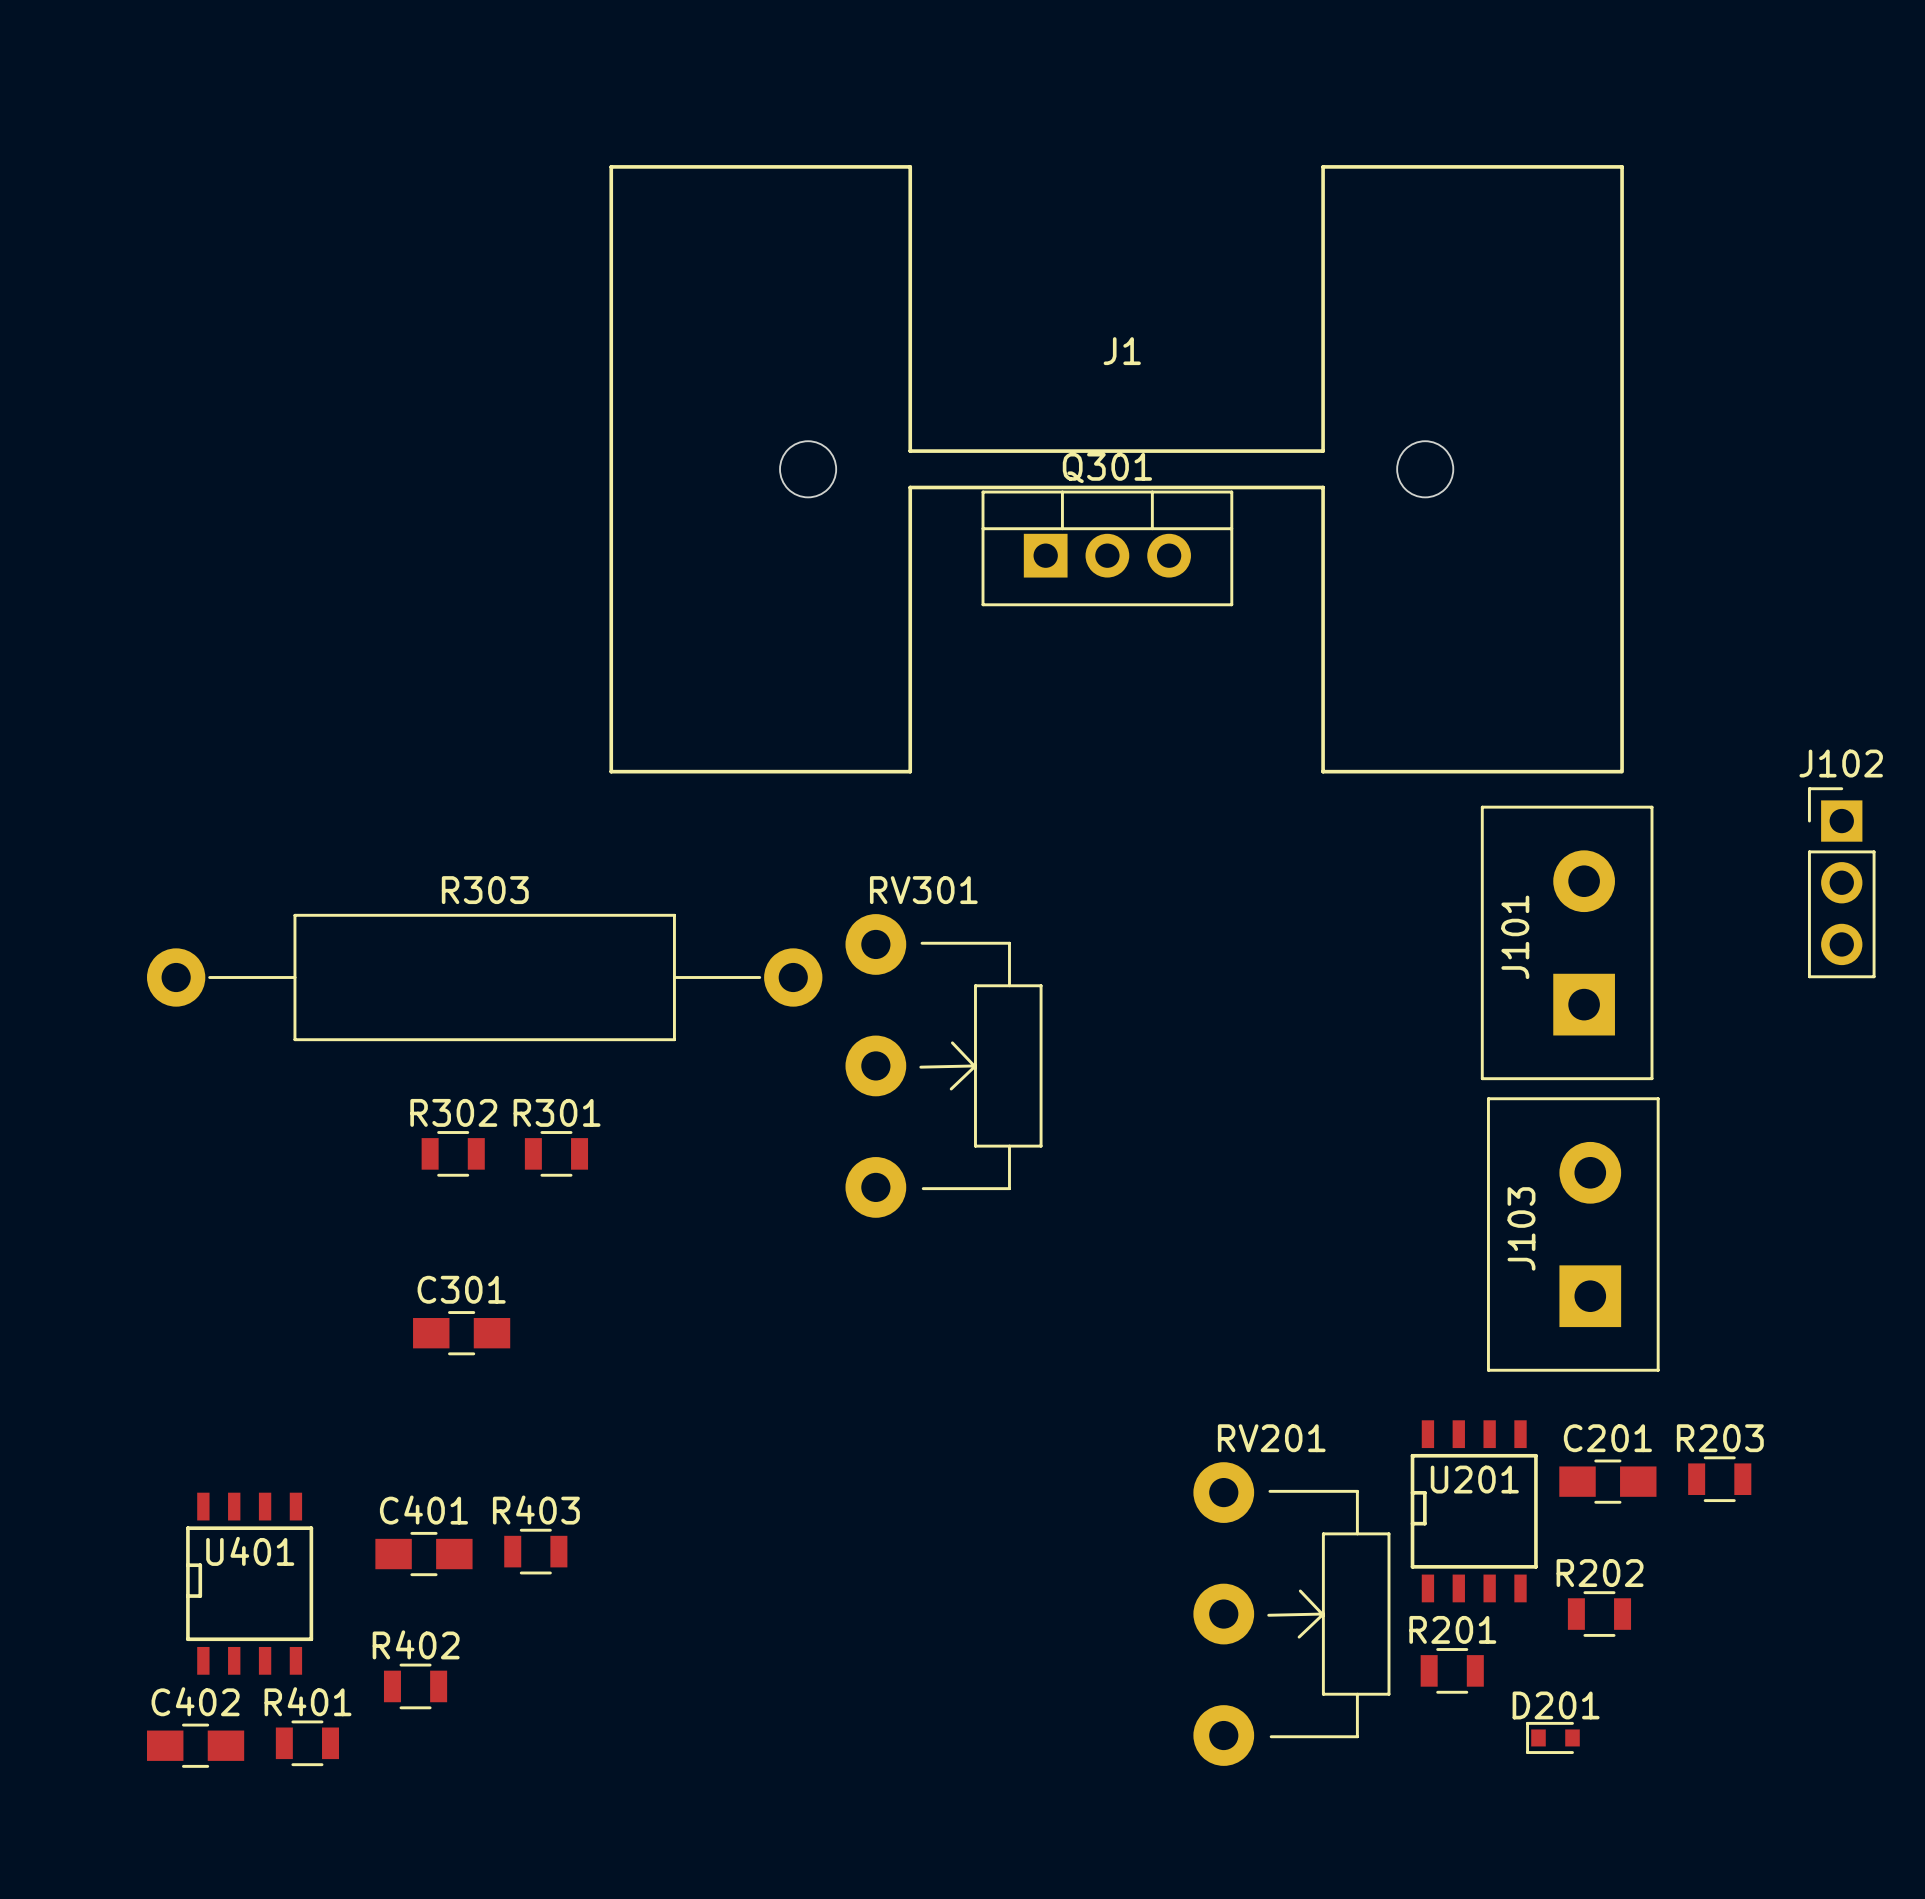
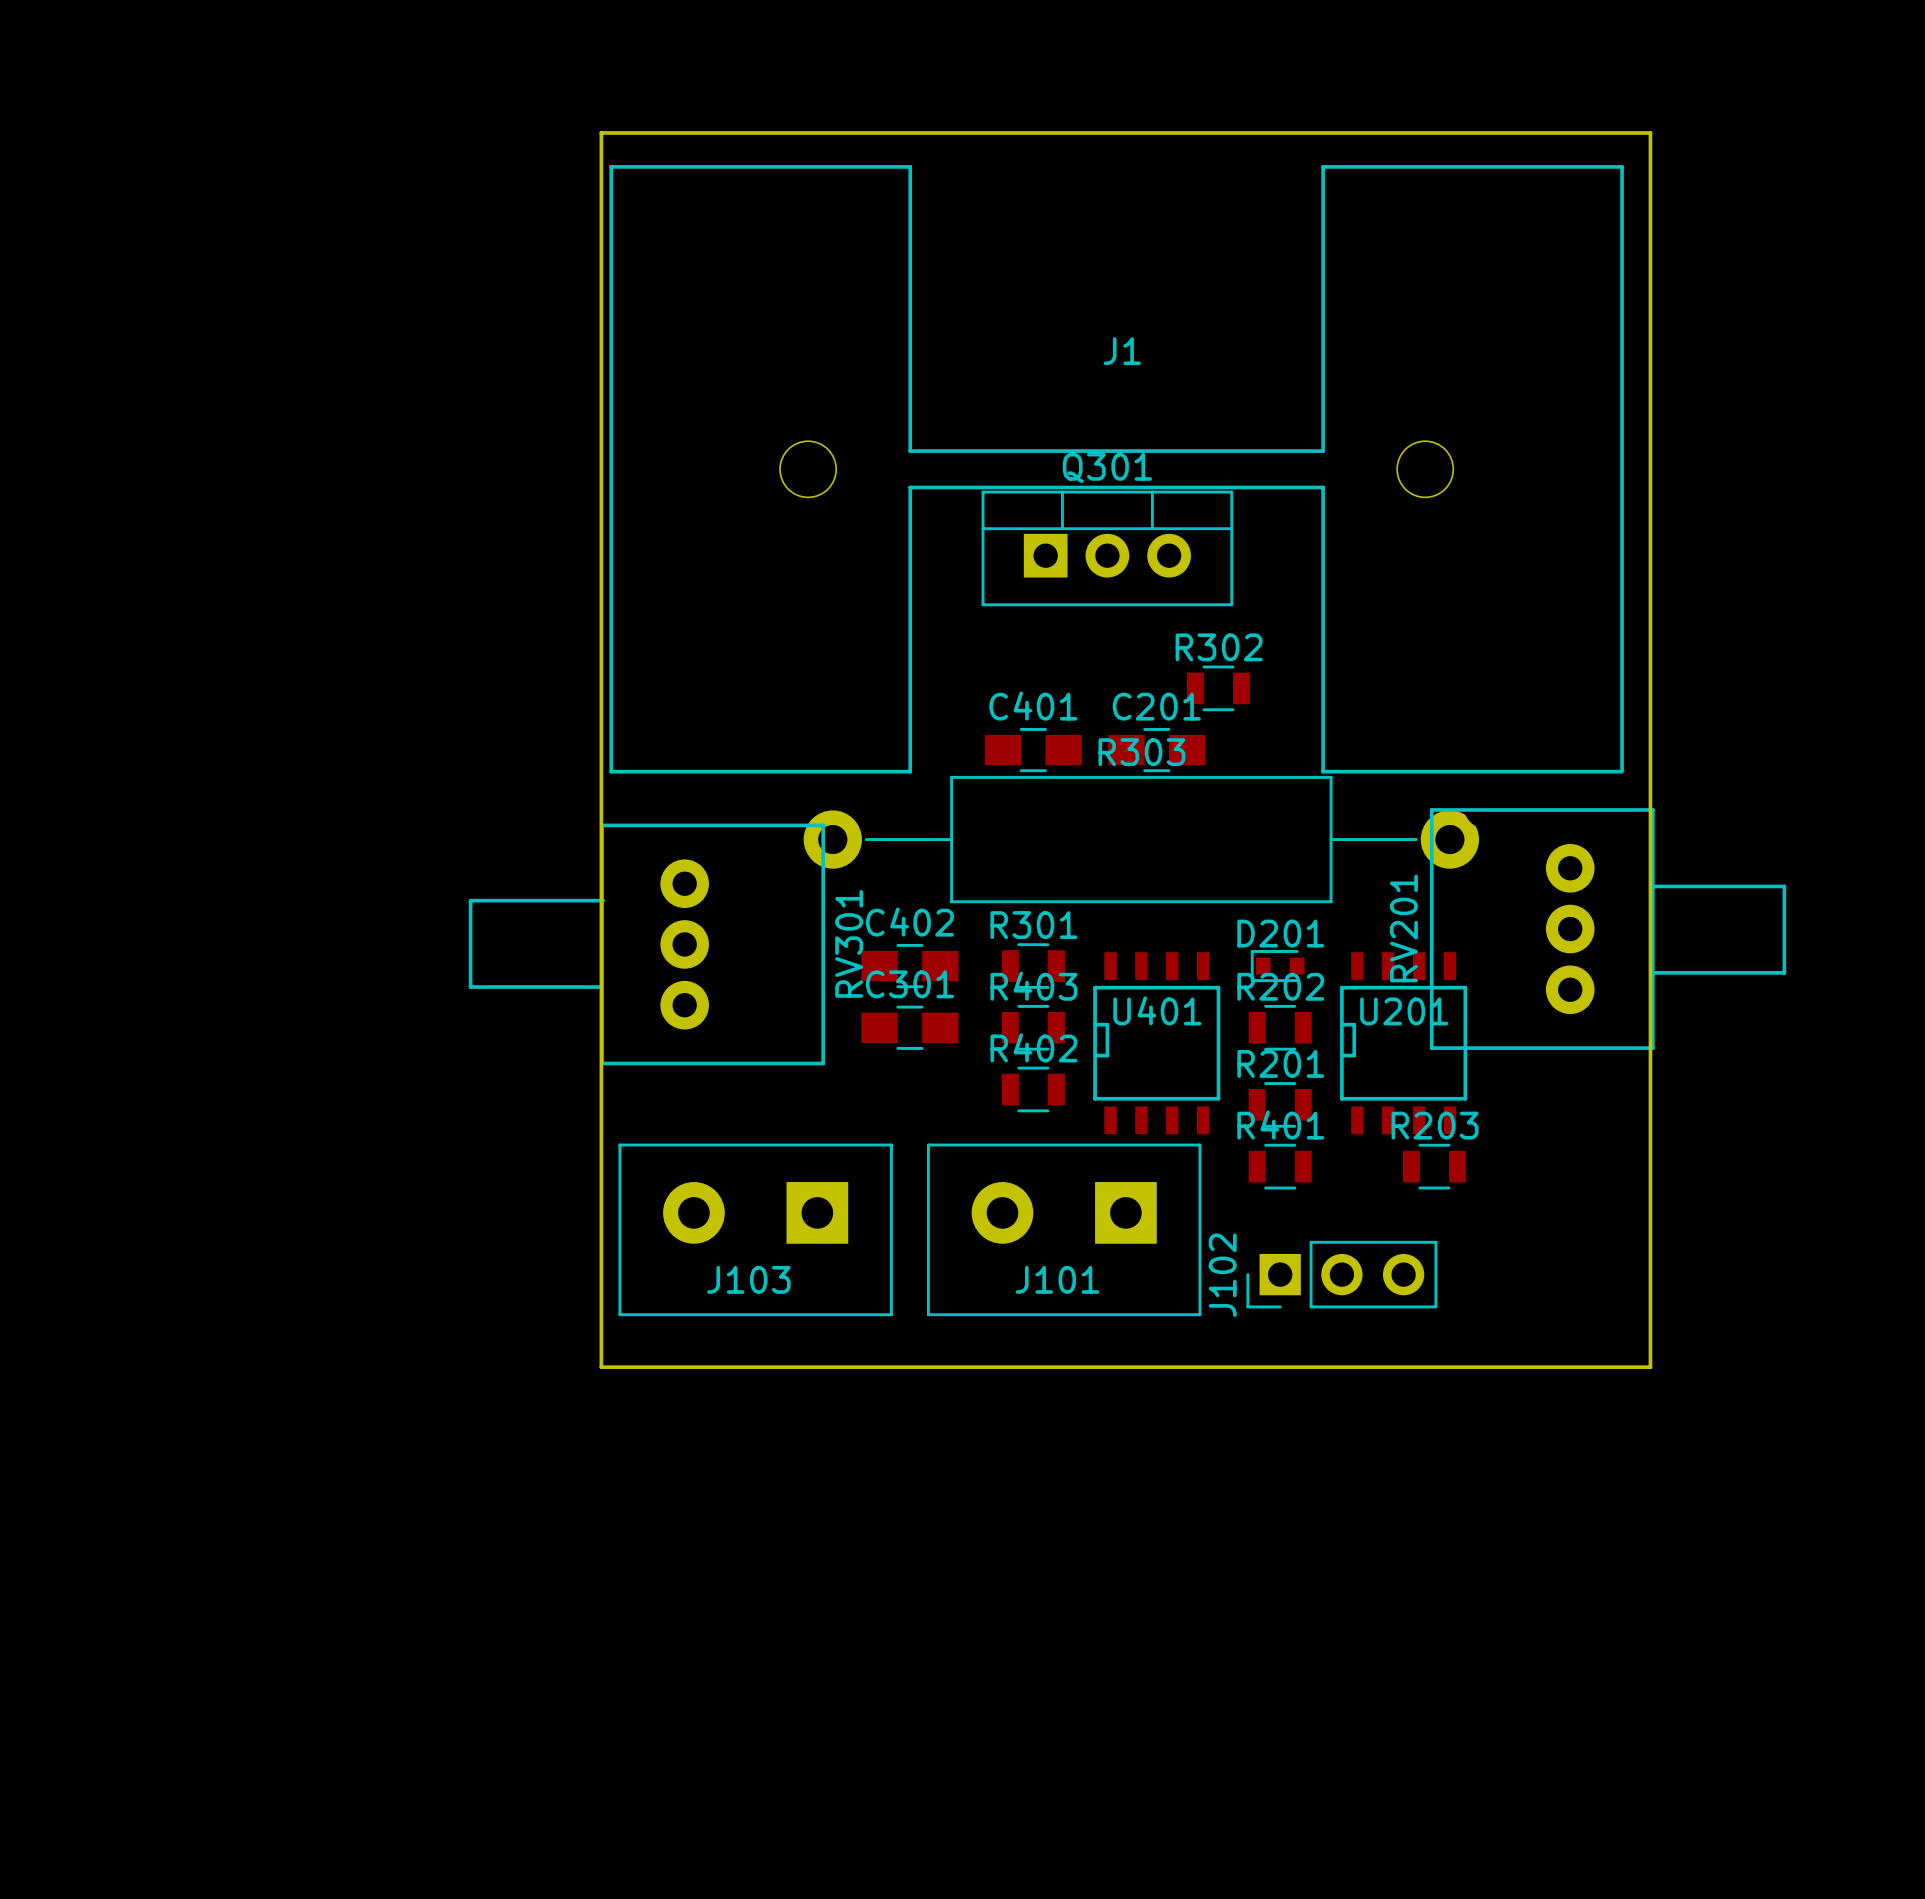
board edge: none -> (601, 132) (601, 1367) (1650, 1367) (1650, 132) (601, 132)
J102 rotation: 0° (1841, 882) -> 90° counterclockwise (1341, 1274)
J102 position: (1841, 882) -> (1341, 1274)
RV301 name position: RV301 (923, 890) -> RV301 (849, 943)
RV301 footprint: [845, 914, 1043, 1218] -> [468, 796, 825, 1093]
J101 rotation: 0° (1567, 942) -> 90° counterclockwise (1064, 1229)
J101 position: (1567, 942) -> (1064, 1229)
R303 position: (484, 977) -> (1141, 839)
R302 position: (453, 1153) -> (1218, 688)
R301 position: (556, 1153) -> (1033, 966)
J103 rotation: 0° (1573, 1234) -> 90° counterclockwise (755, 1229)
J103 position: (1573, 1234) -> (755, 1229)
C301 position: (461, 1333) -> (909, 1027)
RV201 name position: RV201 (1271, 1438) -> RV201 (1403, 928)
RV201 footprint: [1193, 1462, 1391, 1766] -> [1429, 780, 1787, 1078]
R203 position: (1719, 1479) -> (1434, 1166)
C201 position: (1607, 1481) -> (1156, 750)
U201 position: (1474, 1511) -> (1403, 1043)
R403 position: (535, 1551) -> (1033, 1027)
C401 position: (423, 1554) -> (1033, 750)
U401 position: (249, 1583) -> (1156, 1043)
R202 position: (1599, 1614) -> (1280, 1027)
R201 position: (1452, 1670) -> (1280, 1104)
R402 position: (415, 1686) -> (1033, 1089)
D201 position: (1552, 1737) -> (1277, 966)
R401 position: (307, 1743) -> (1280, 1166)
C402 position: (195, 1745) -> (909, 966)

